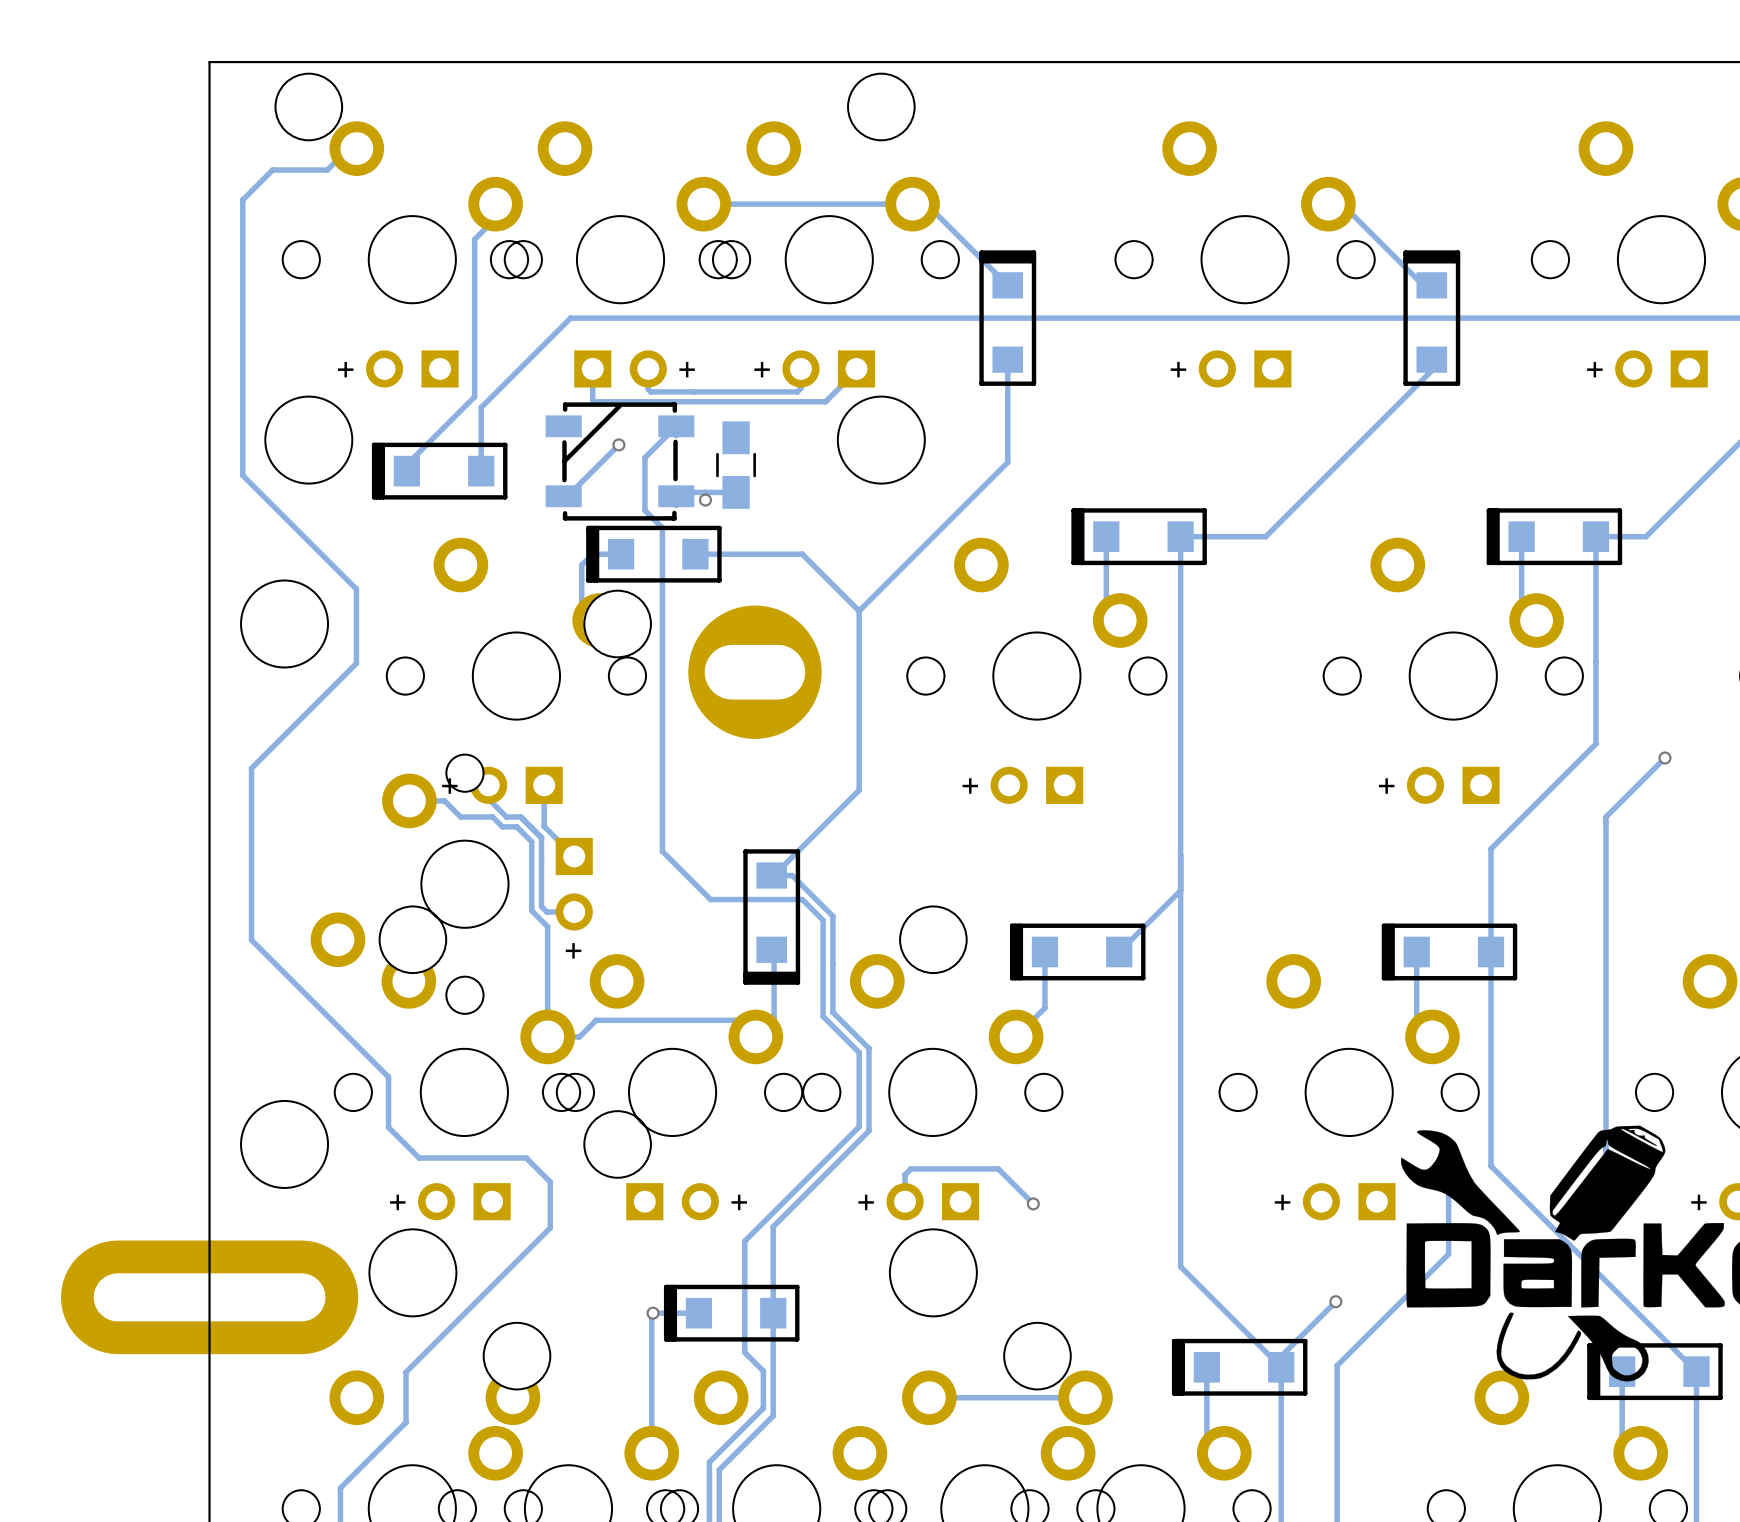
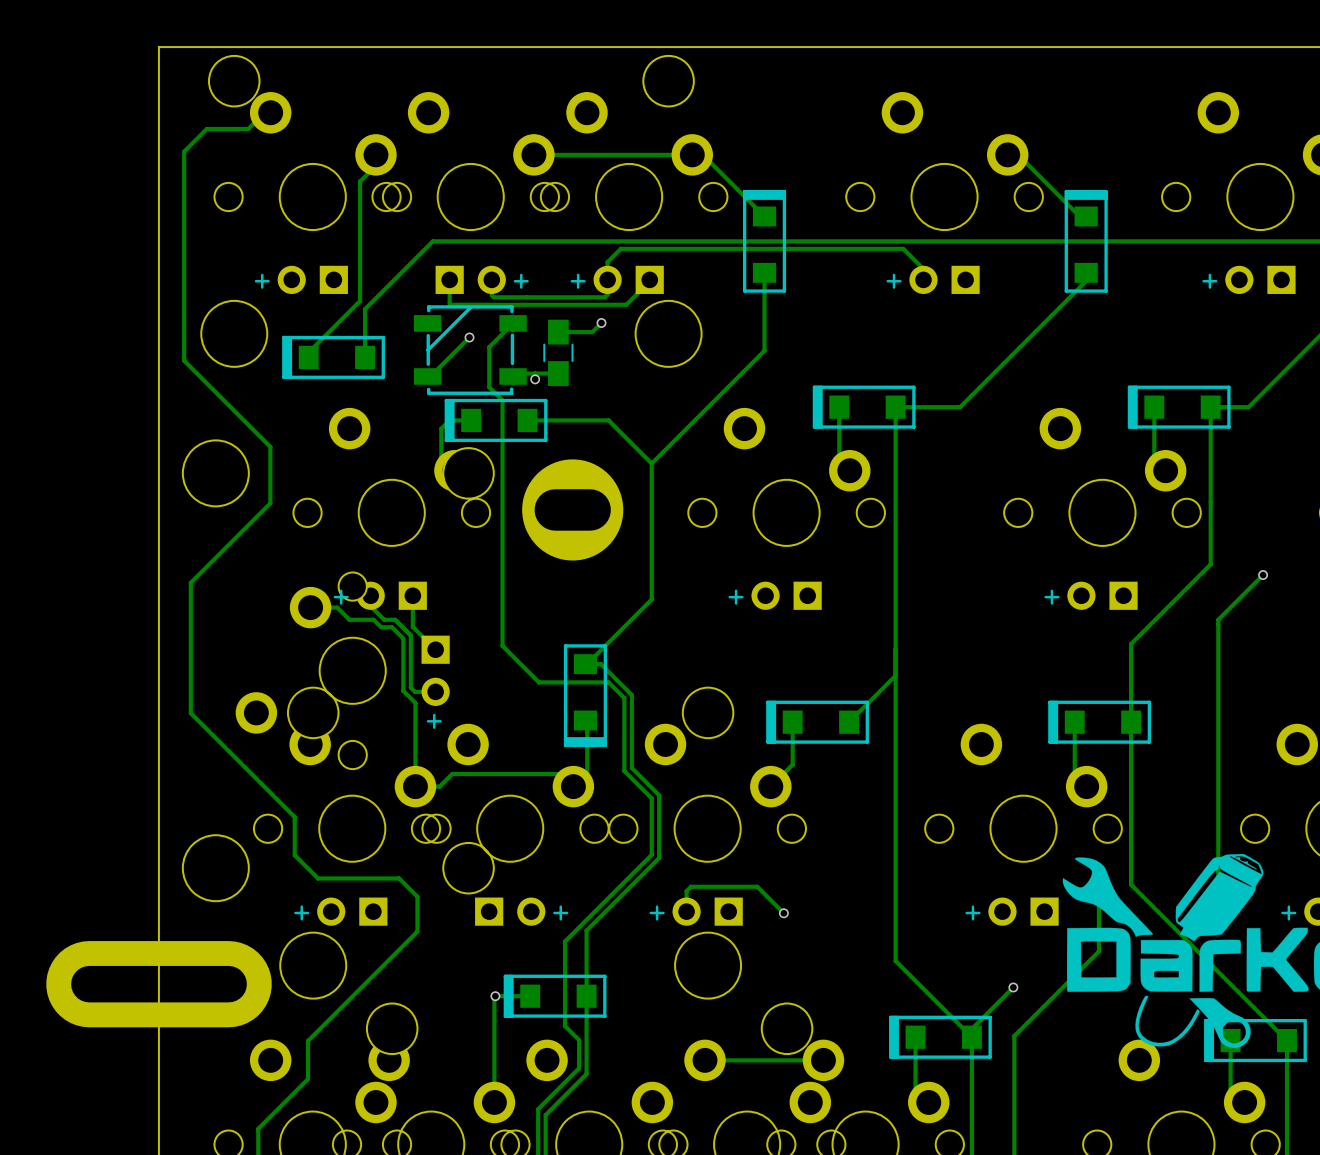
track: none -> (923, 279) (923, 269) (903, 248) (620, 248) (607, 262) (607, 279)
track: none -> (601, 322) (592, 332) (558, 332)
via: none -> (601, 322)

